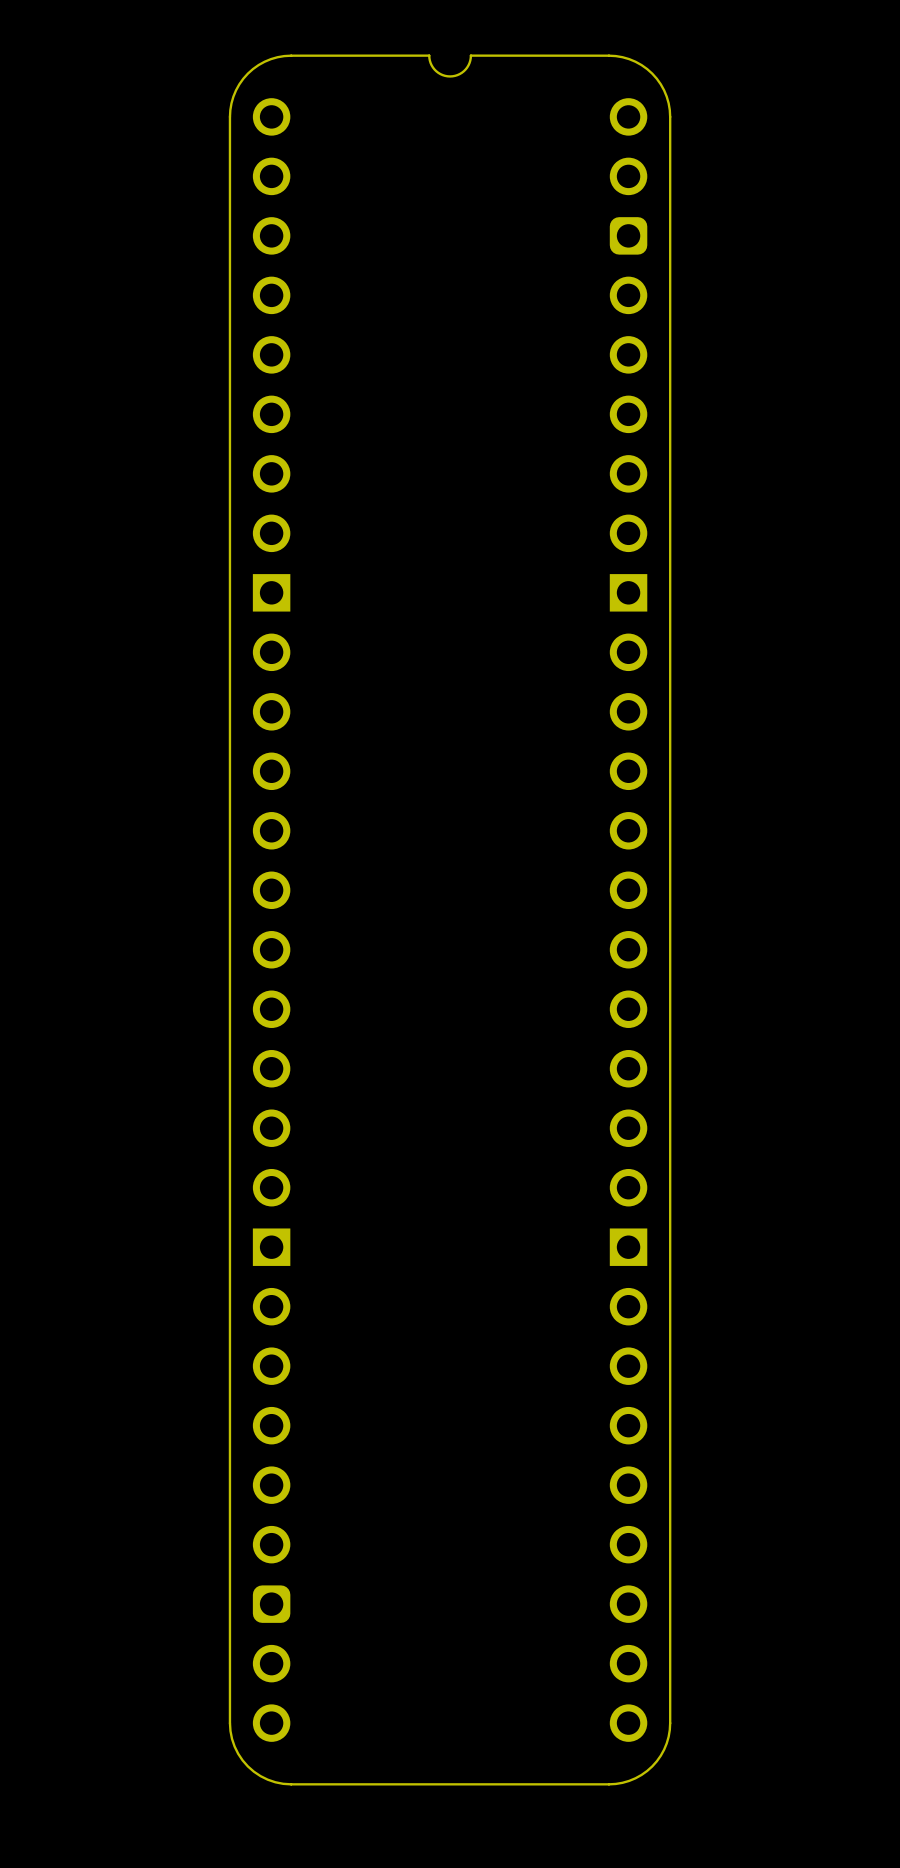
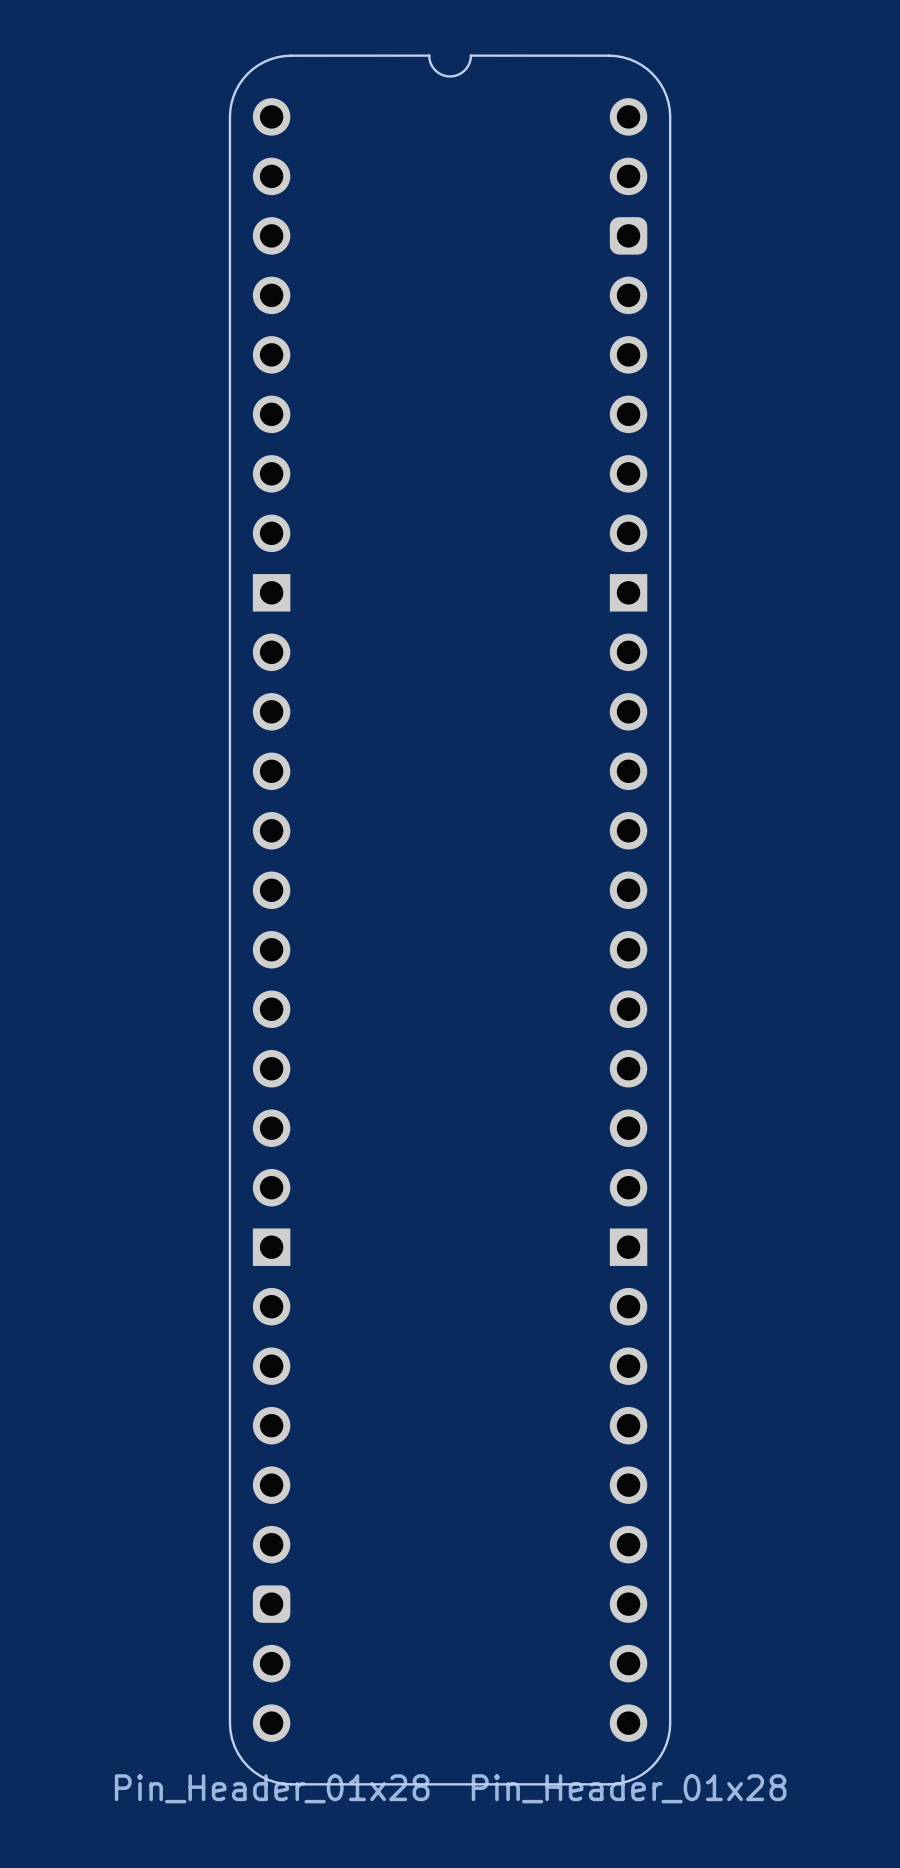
drawing: none -> [114, 1774, 787, 1804]

